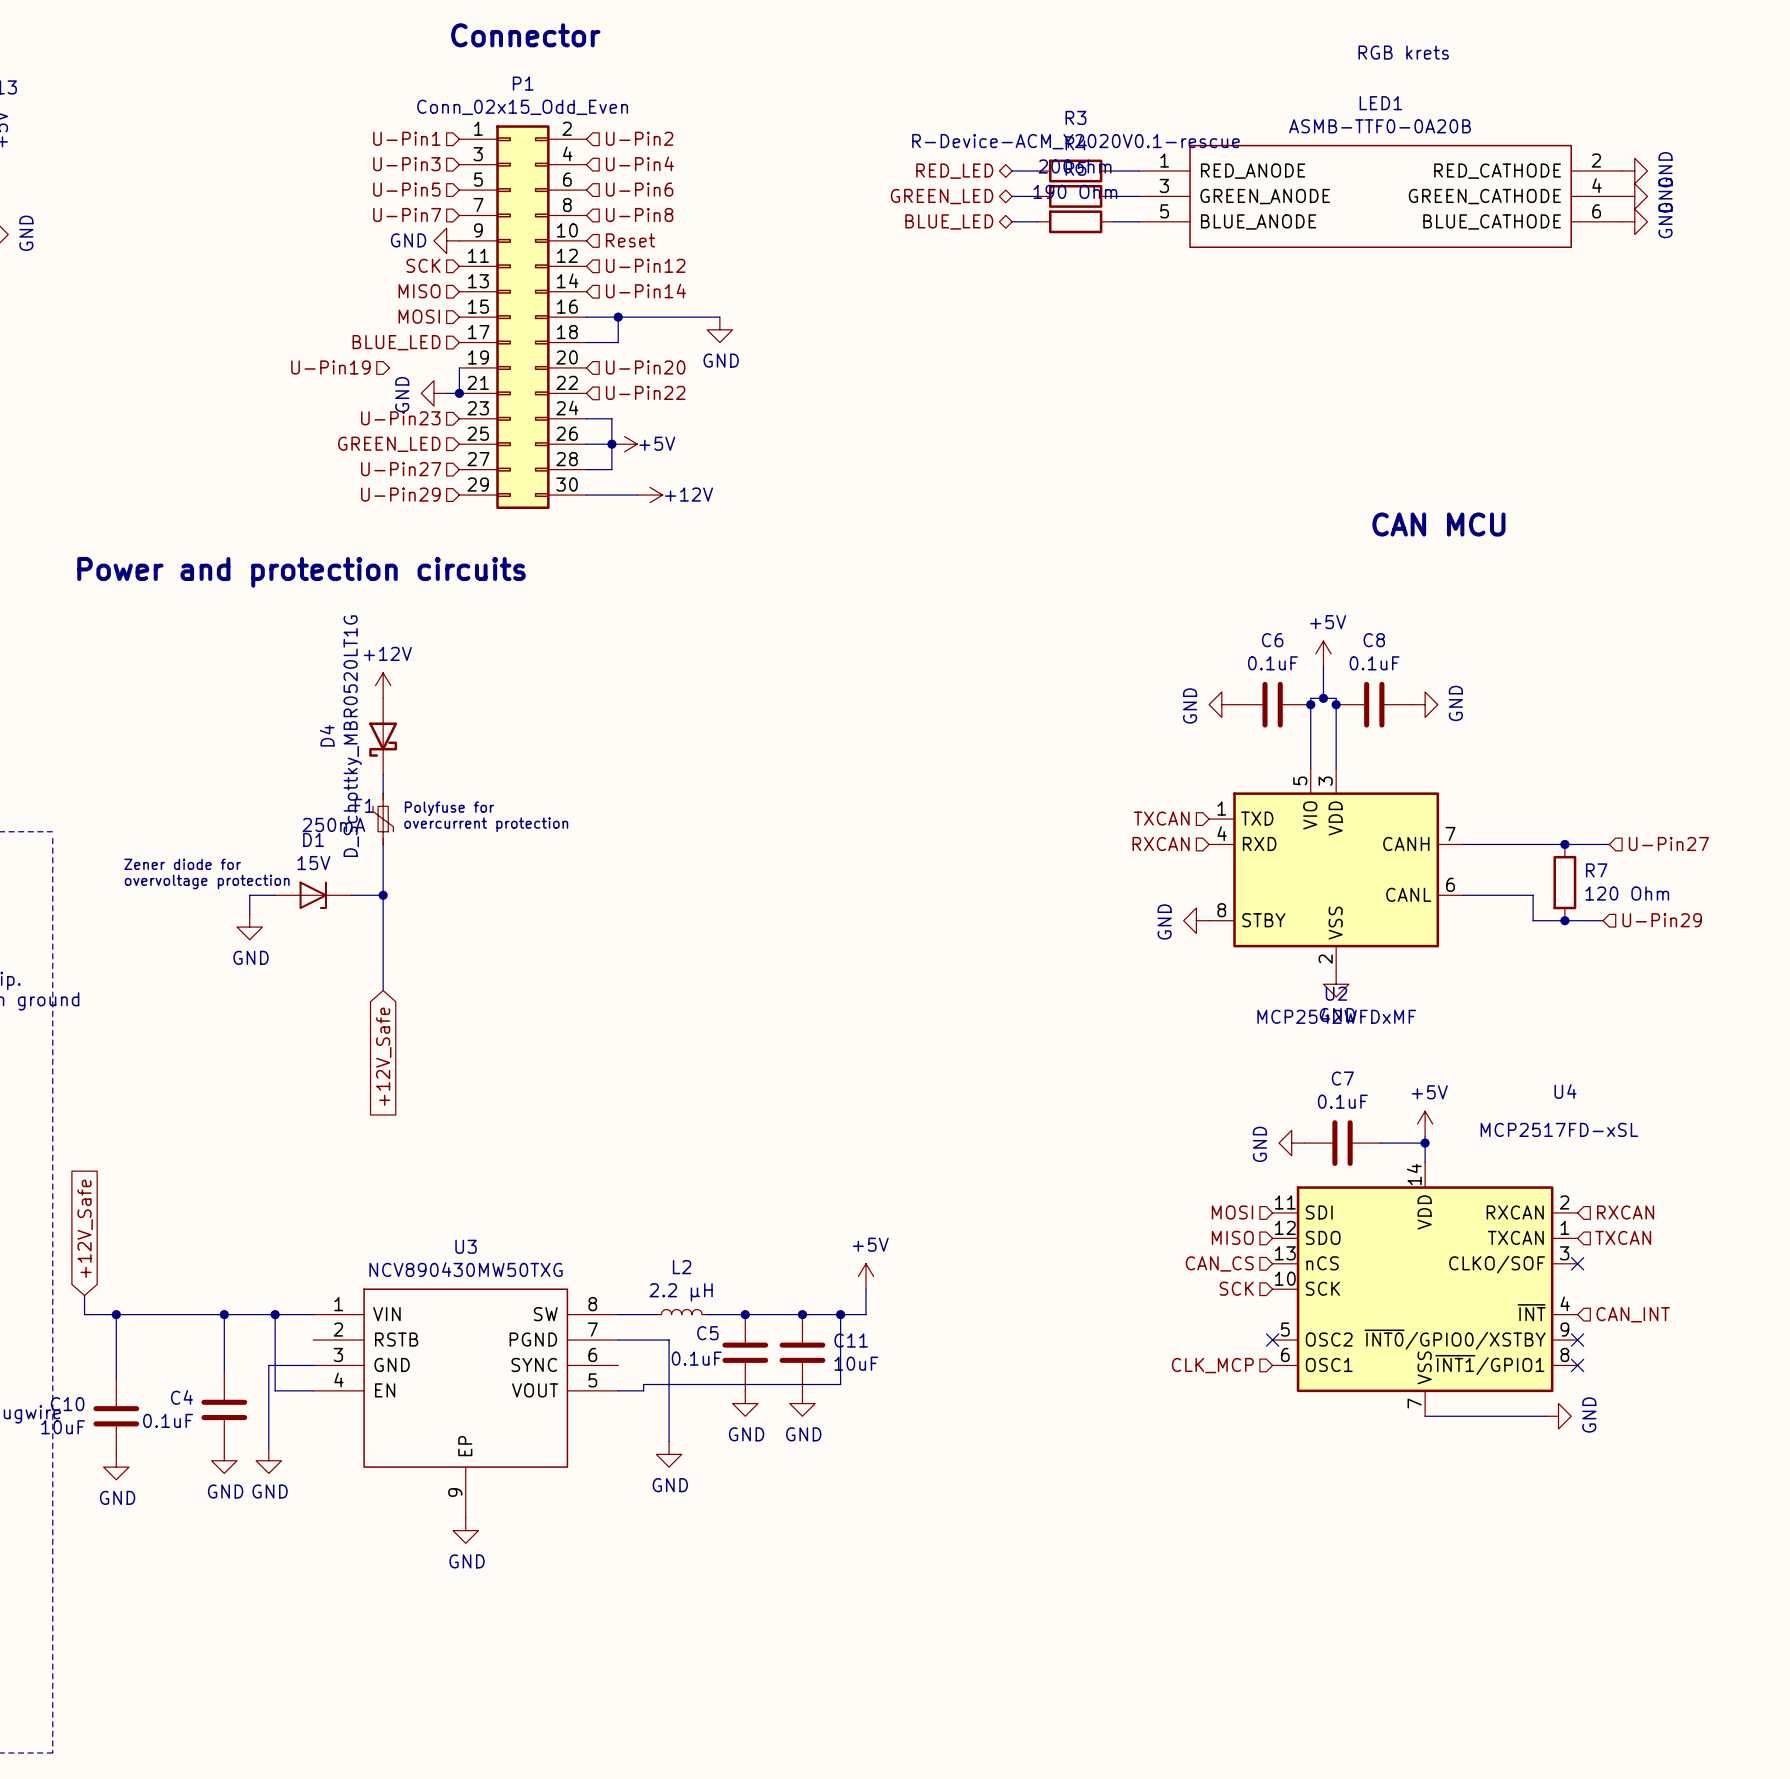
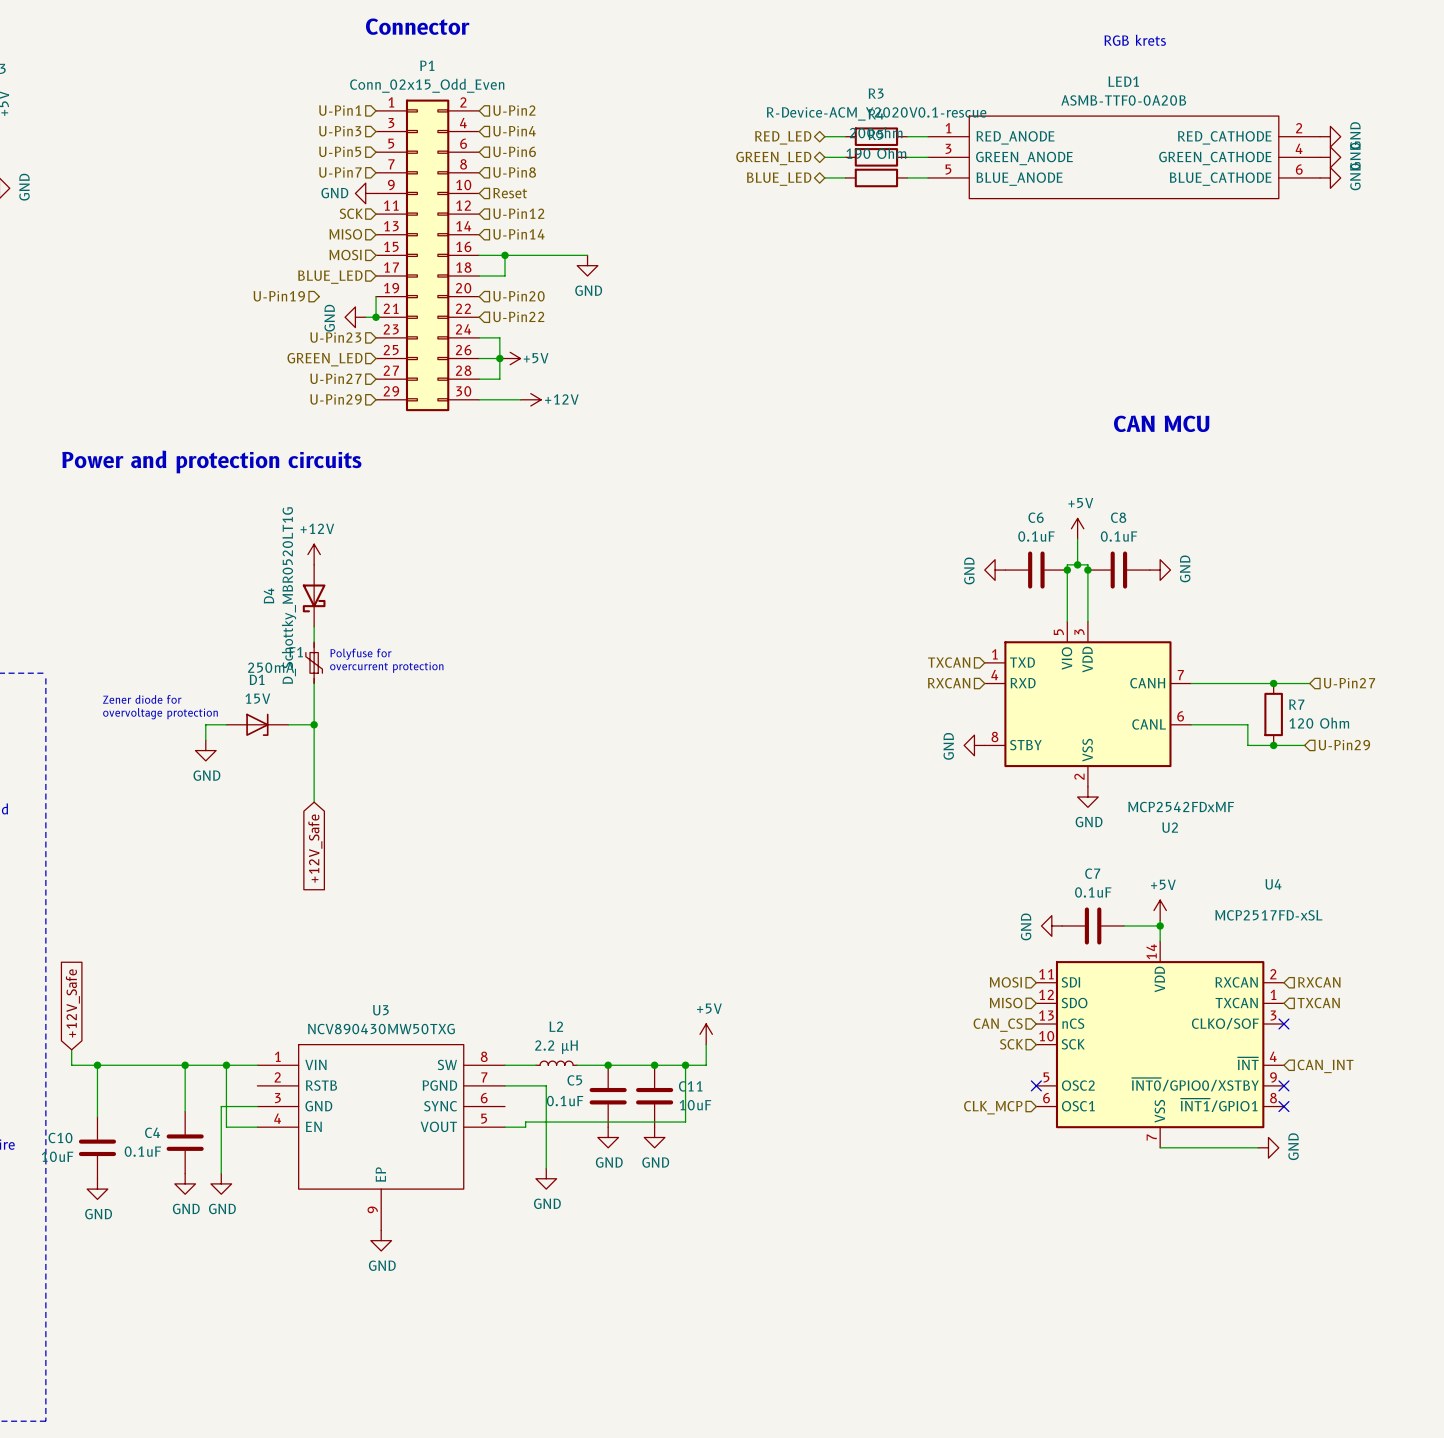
U2 name position: U2 (1336, 993) -> U2 (1170, 827)
U2 value: MCP2542WFDxMF (1336, 1016) -> MCP2542FDxMF (1181, 807)

